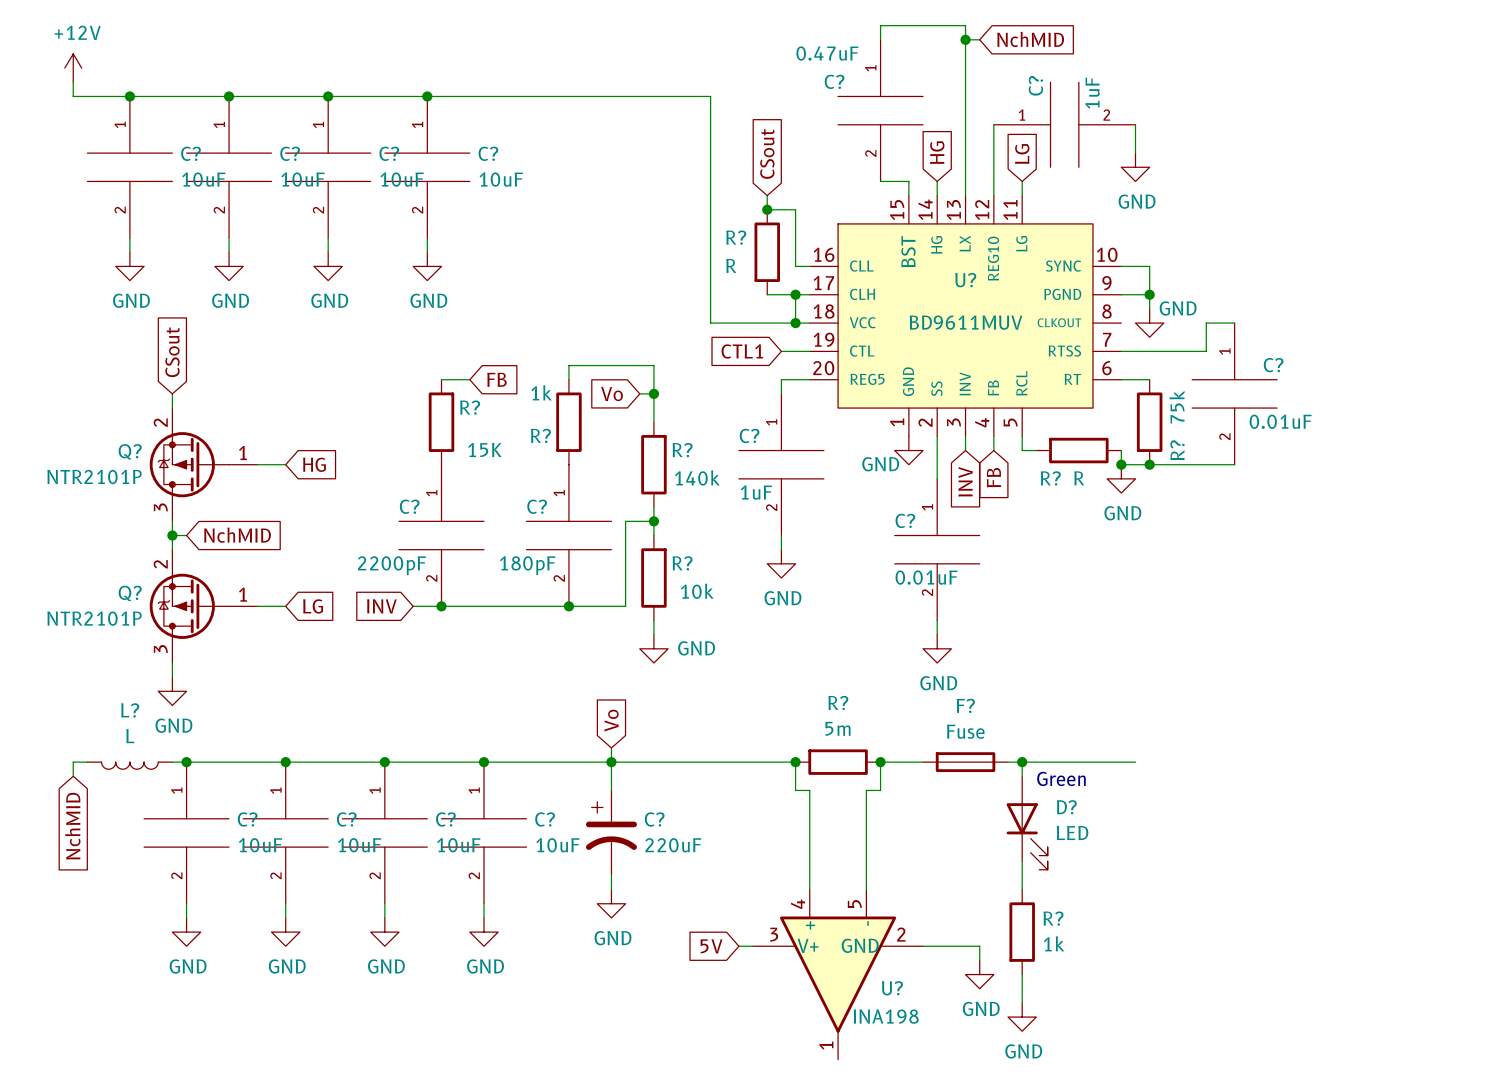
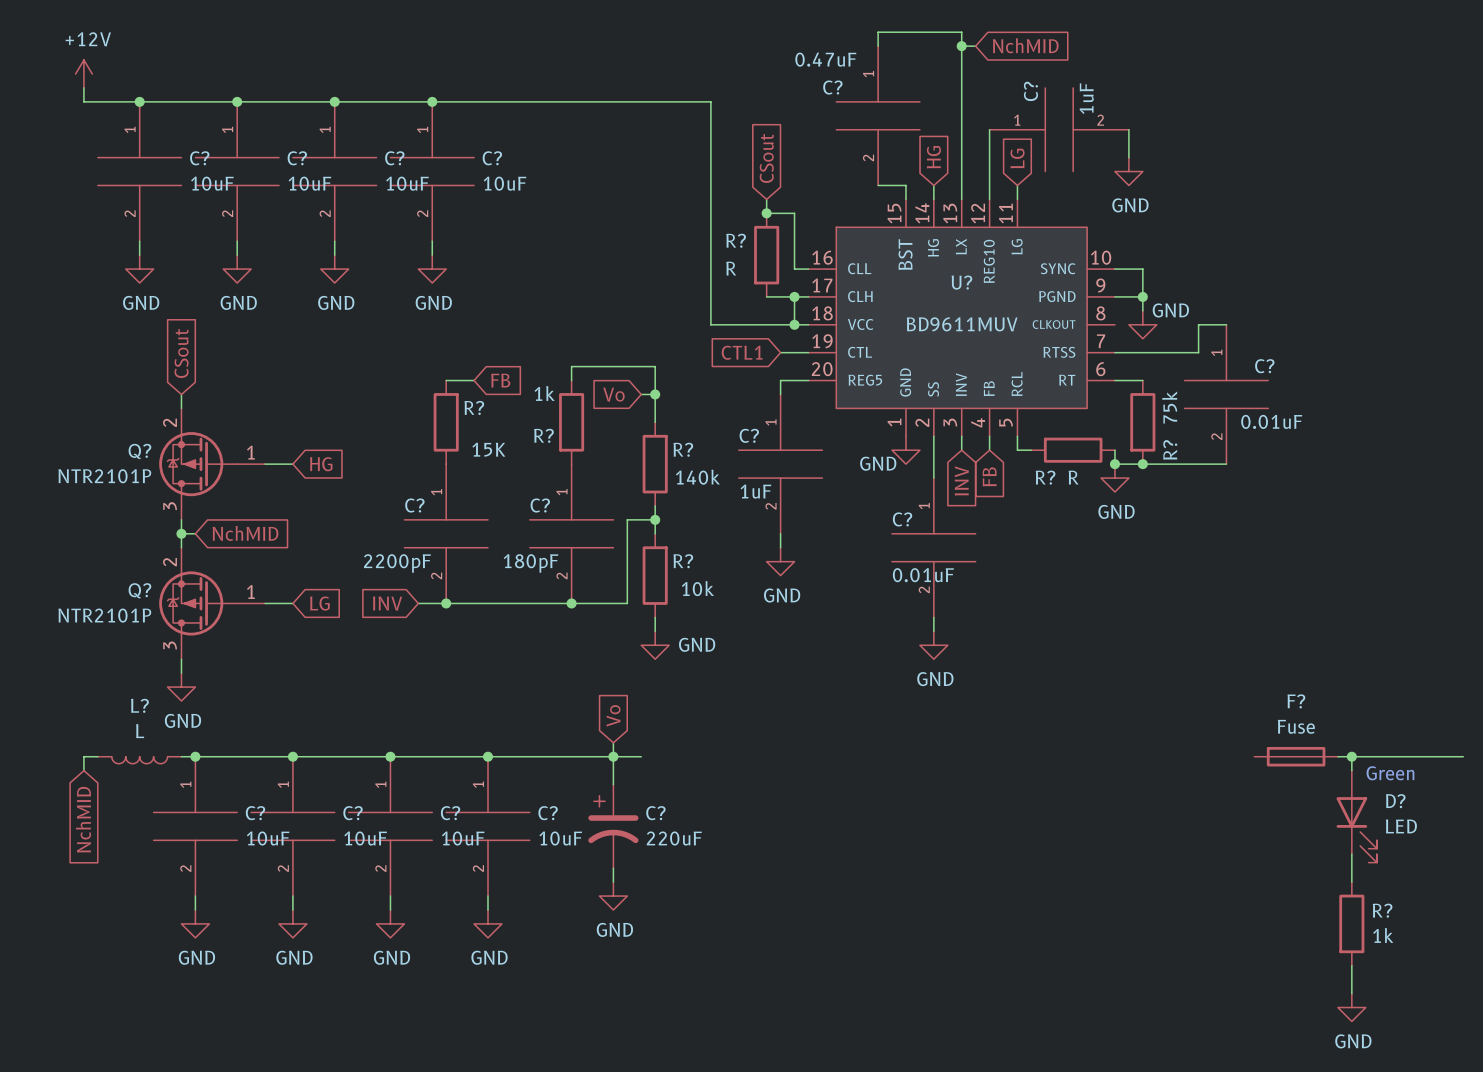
wire: (639, 762) (795, 762) (795, 790) (809, 790) (809, 889) -> none
junction: (795, 762) -> none
R?: 5m (838, 762) -> none
junction: (880, 762) -> none
wire: (923, 762) (880, 762) (880, 790) (866, 790) (866, 889) -> none
F?: Fuse (965, 762) -> none
wire: (1008, 762) (1135, 762) -> none
wire: (1022, 762) (1022, 776) -> none
junction: (1022, 762) -> none
F?: none -> Fuse (1296, 756)
wire: none -> (1337, 756) (1463, 756)
wire: none -> (1351, 756) (1351, 770)
junction: none -> (1351, 756)
text: Green (1061, 778) -> none
text: none -> Green (1390, 773)
D?: LED (1027, 823) -> none
D?: none -> LED (1356, 816)
wire: (1022, 861) (1022, 889) -> none
wire: none -> (1351, 854) (1351, 882)
R?: 1k (1022, 932) -> none
R?: none -> 1k (1351, 923)
global label: 5V (711, 946) -> none
wire: (738, 946) (753, 946) -> none
wire: (923, 946) (979, 946) (979, 960) -> none
U?: INA198 (838, 974) -> none
power symbol: GND (979, 974) -> none
wire: (1022, 974) (1022, 1002) -> none
wire: none -> (1351, 965) (1351, 993)
power symbol: GND (1022, 1017) -> none
power symbol: none -> GND (1351, 1007)

